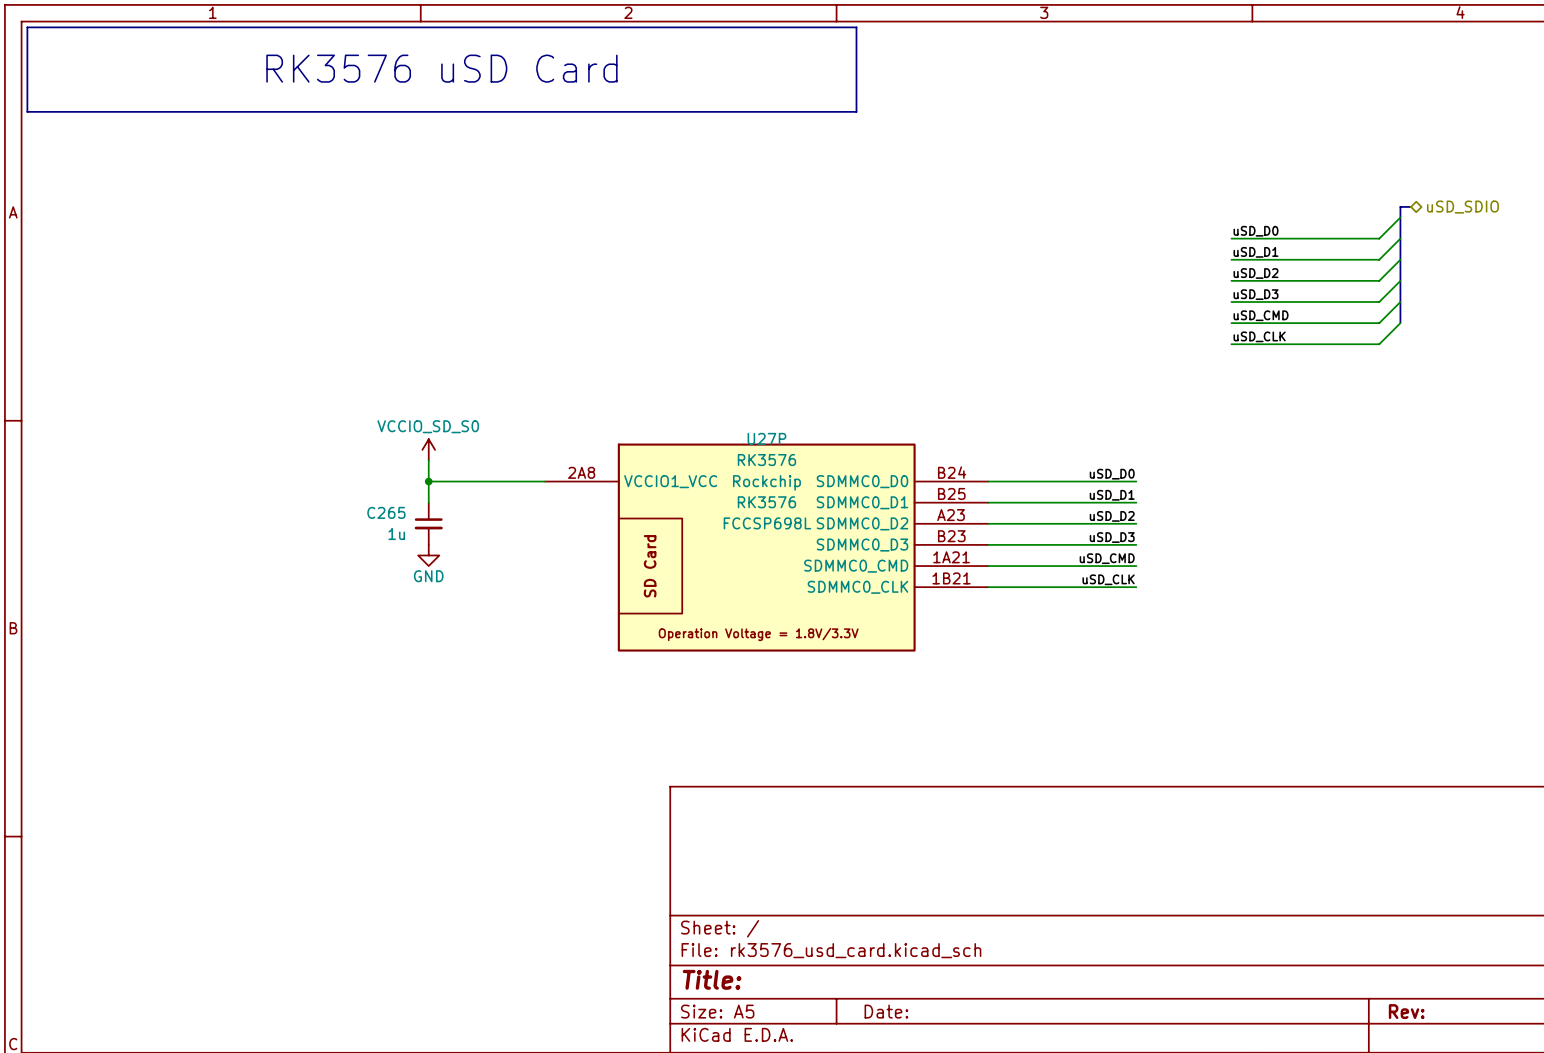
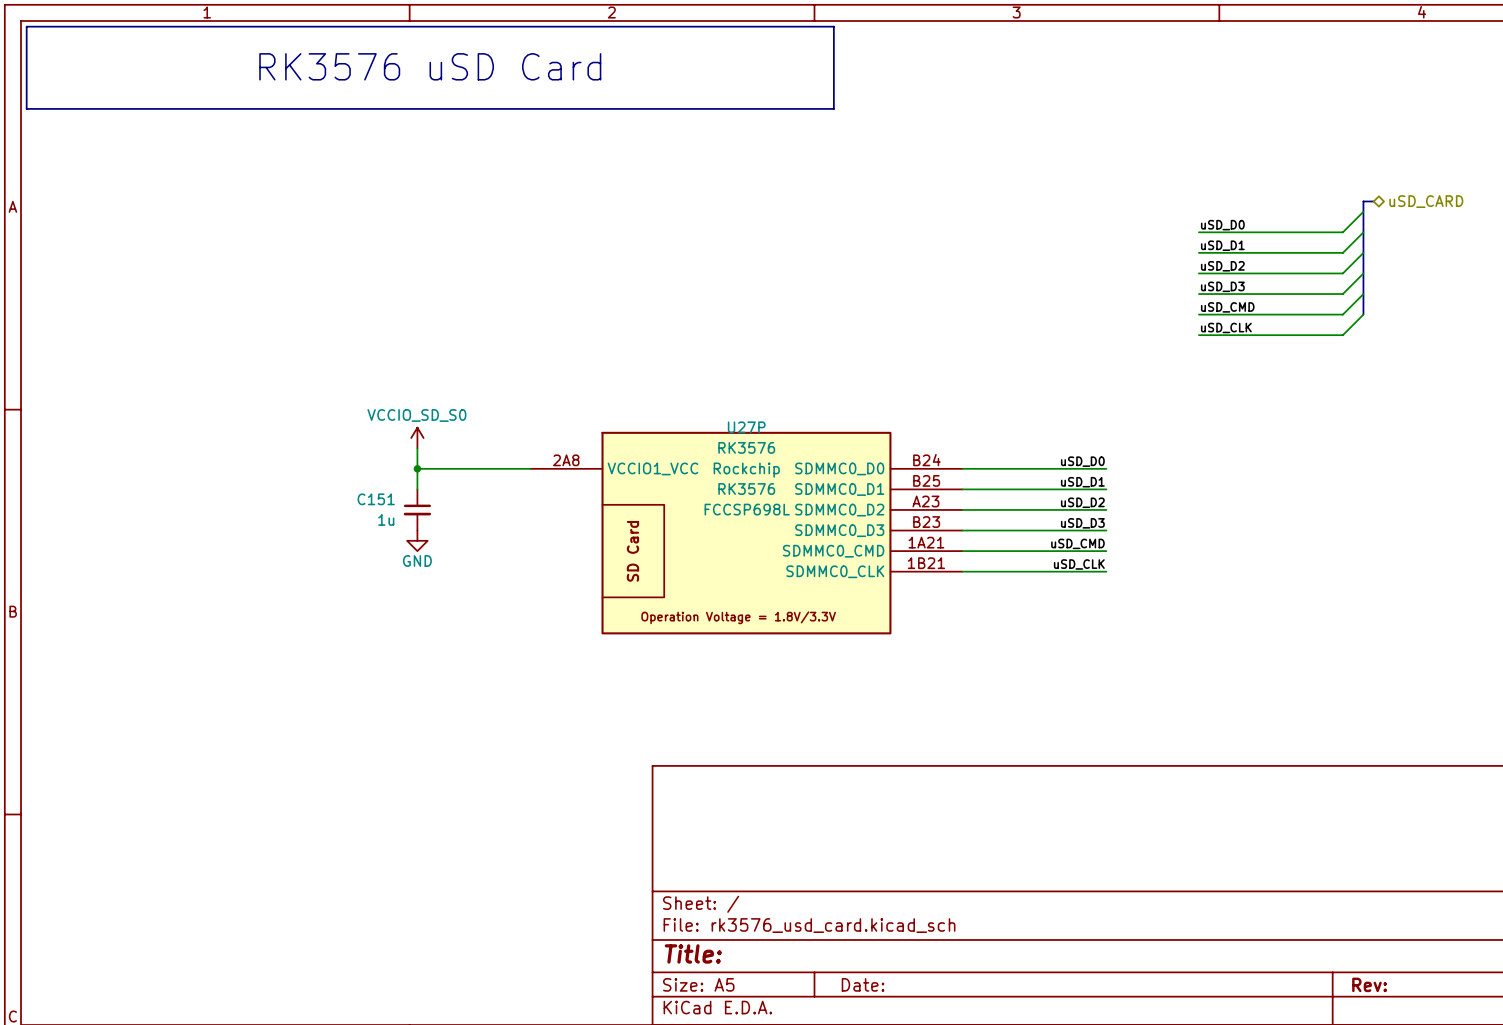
hierarchical label: uSD_SDIO (1462, 207) -> uSD_CARD (1426, 201)
C265 name: C265 (386, 512) -> C151 (376, 499)

